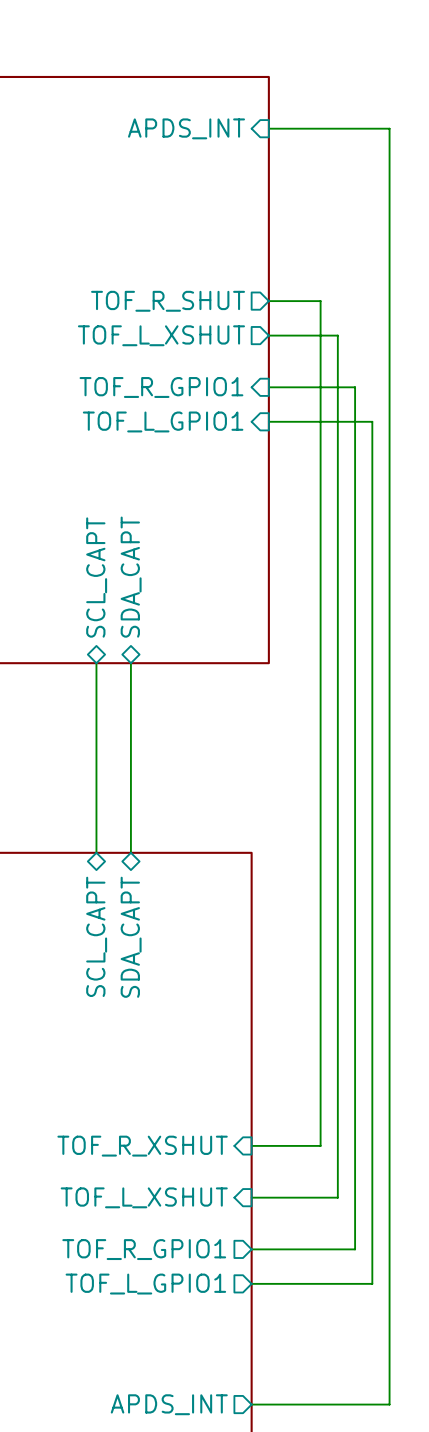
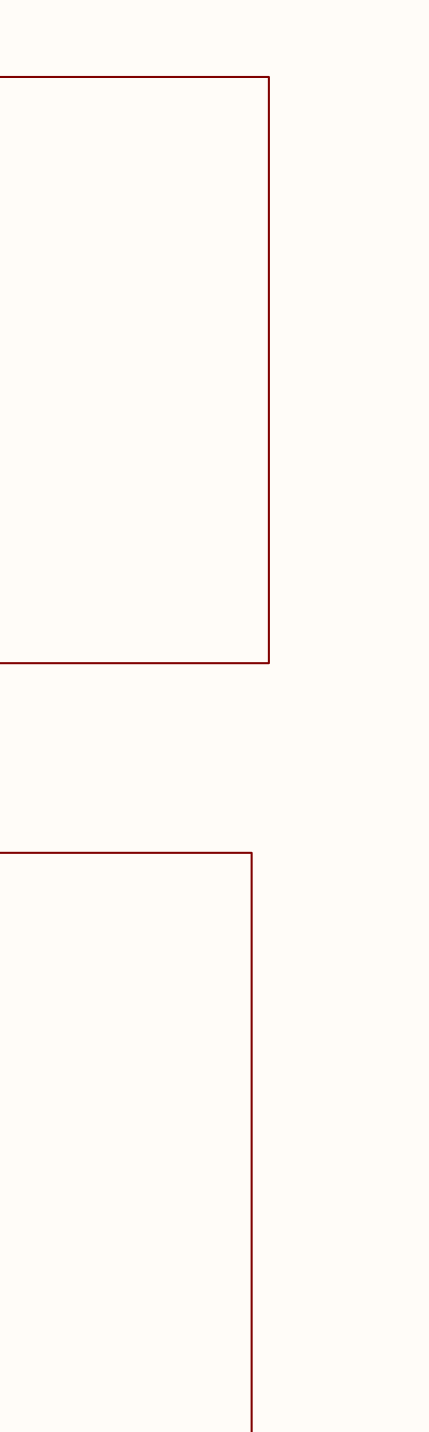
sheet pin: APDS_INT (186, 128) -> none
wire: (268, 128) (389, 128) (389, 1404) (251, 1404) -> none
sheet pin: TOF_R_SHUT (168, 301) -> none
wire: (268, 301) (320, 301) (320, 1145) (251, 1145) -> none
sheet pin: TOF_L_XSHUT (161, 335) -> none
wire: (268, 335) (337, 335) (337, 1197) (251, 1197) -> none
sheet pin: TOF_R_GPIO1 (161, 387) -> none
wire: (268, 387) (355, 387) (355, 1249) (251, 1249) -> none
sheet pin: TOF_L_GPIO1 (163, 421) -> none
wire: (268, 421) (372, 421) (372, 1283) (251, 1283) -> none
sheet pin: SCL_CAPT (96, 577) -> none
sheet pin: SDA_CAPT (131, 577) -> none
wire: (96, 663) (96, 852) -> none
wire: (130, 663) (130, 852) -> none
sheet pin: SCL_CAPT (96, 936) -> none
sheet pin: SDA_CAPT (131, 937) -> none
sheet pin: TOF_R_XSHUT (142, 1146) -> none
sheet pin: TOF_L_XSHUT (144, 1197) -> none
sheet pin: TOF_R_GPIO1 (144, 1249) -> none
sheet pin: TOF_L_GPIO1 (145, 1284) -> none
sheet pin: APDS_INT (169, 1404) -> none

